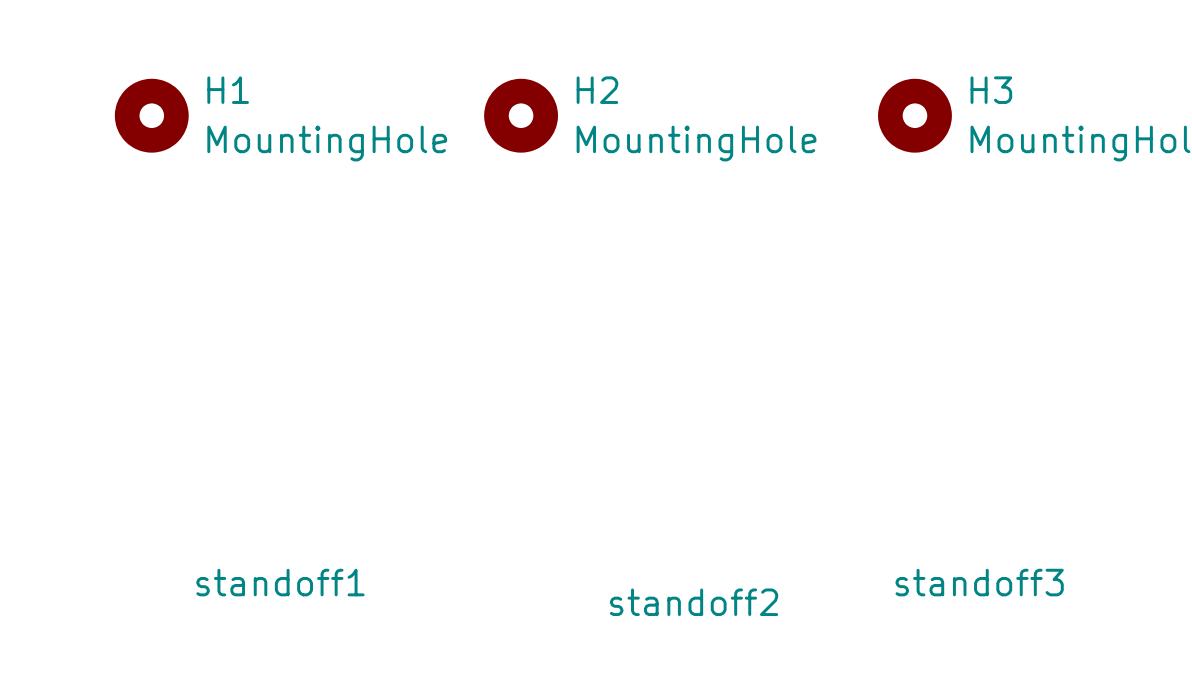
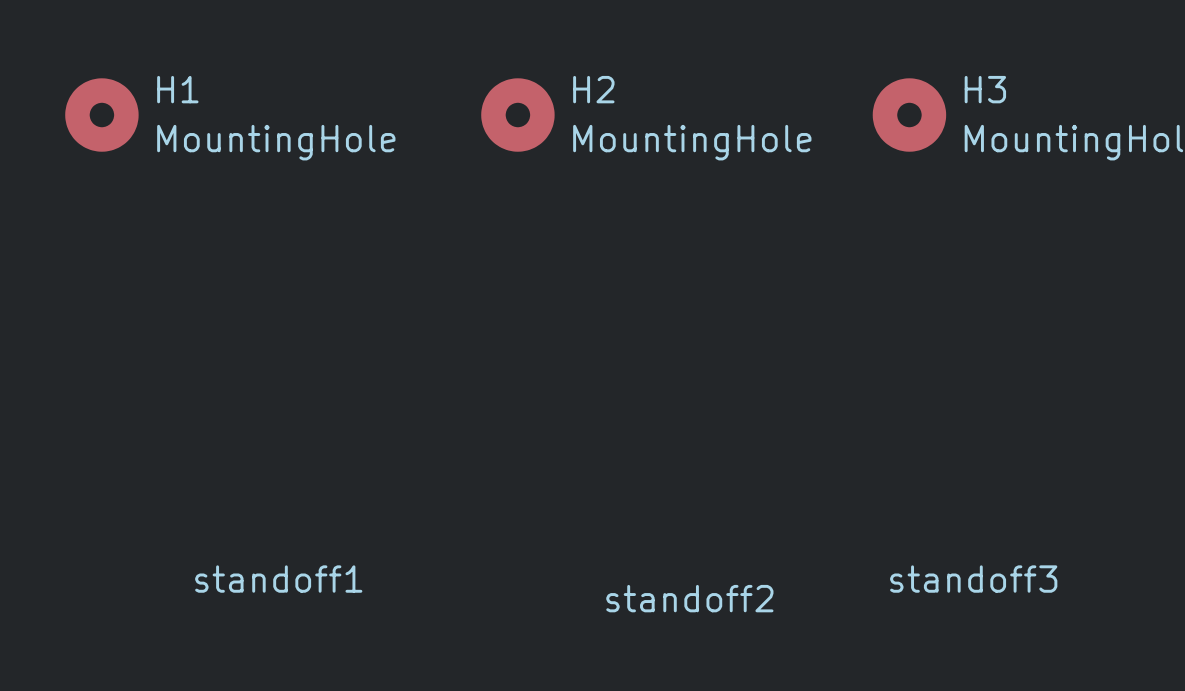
H1 position: (151, 115) -> (101, 115)

